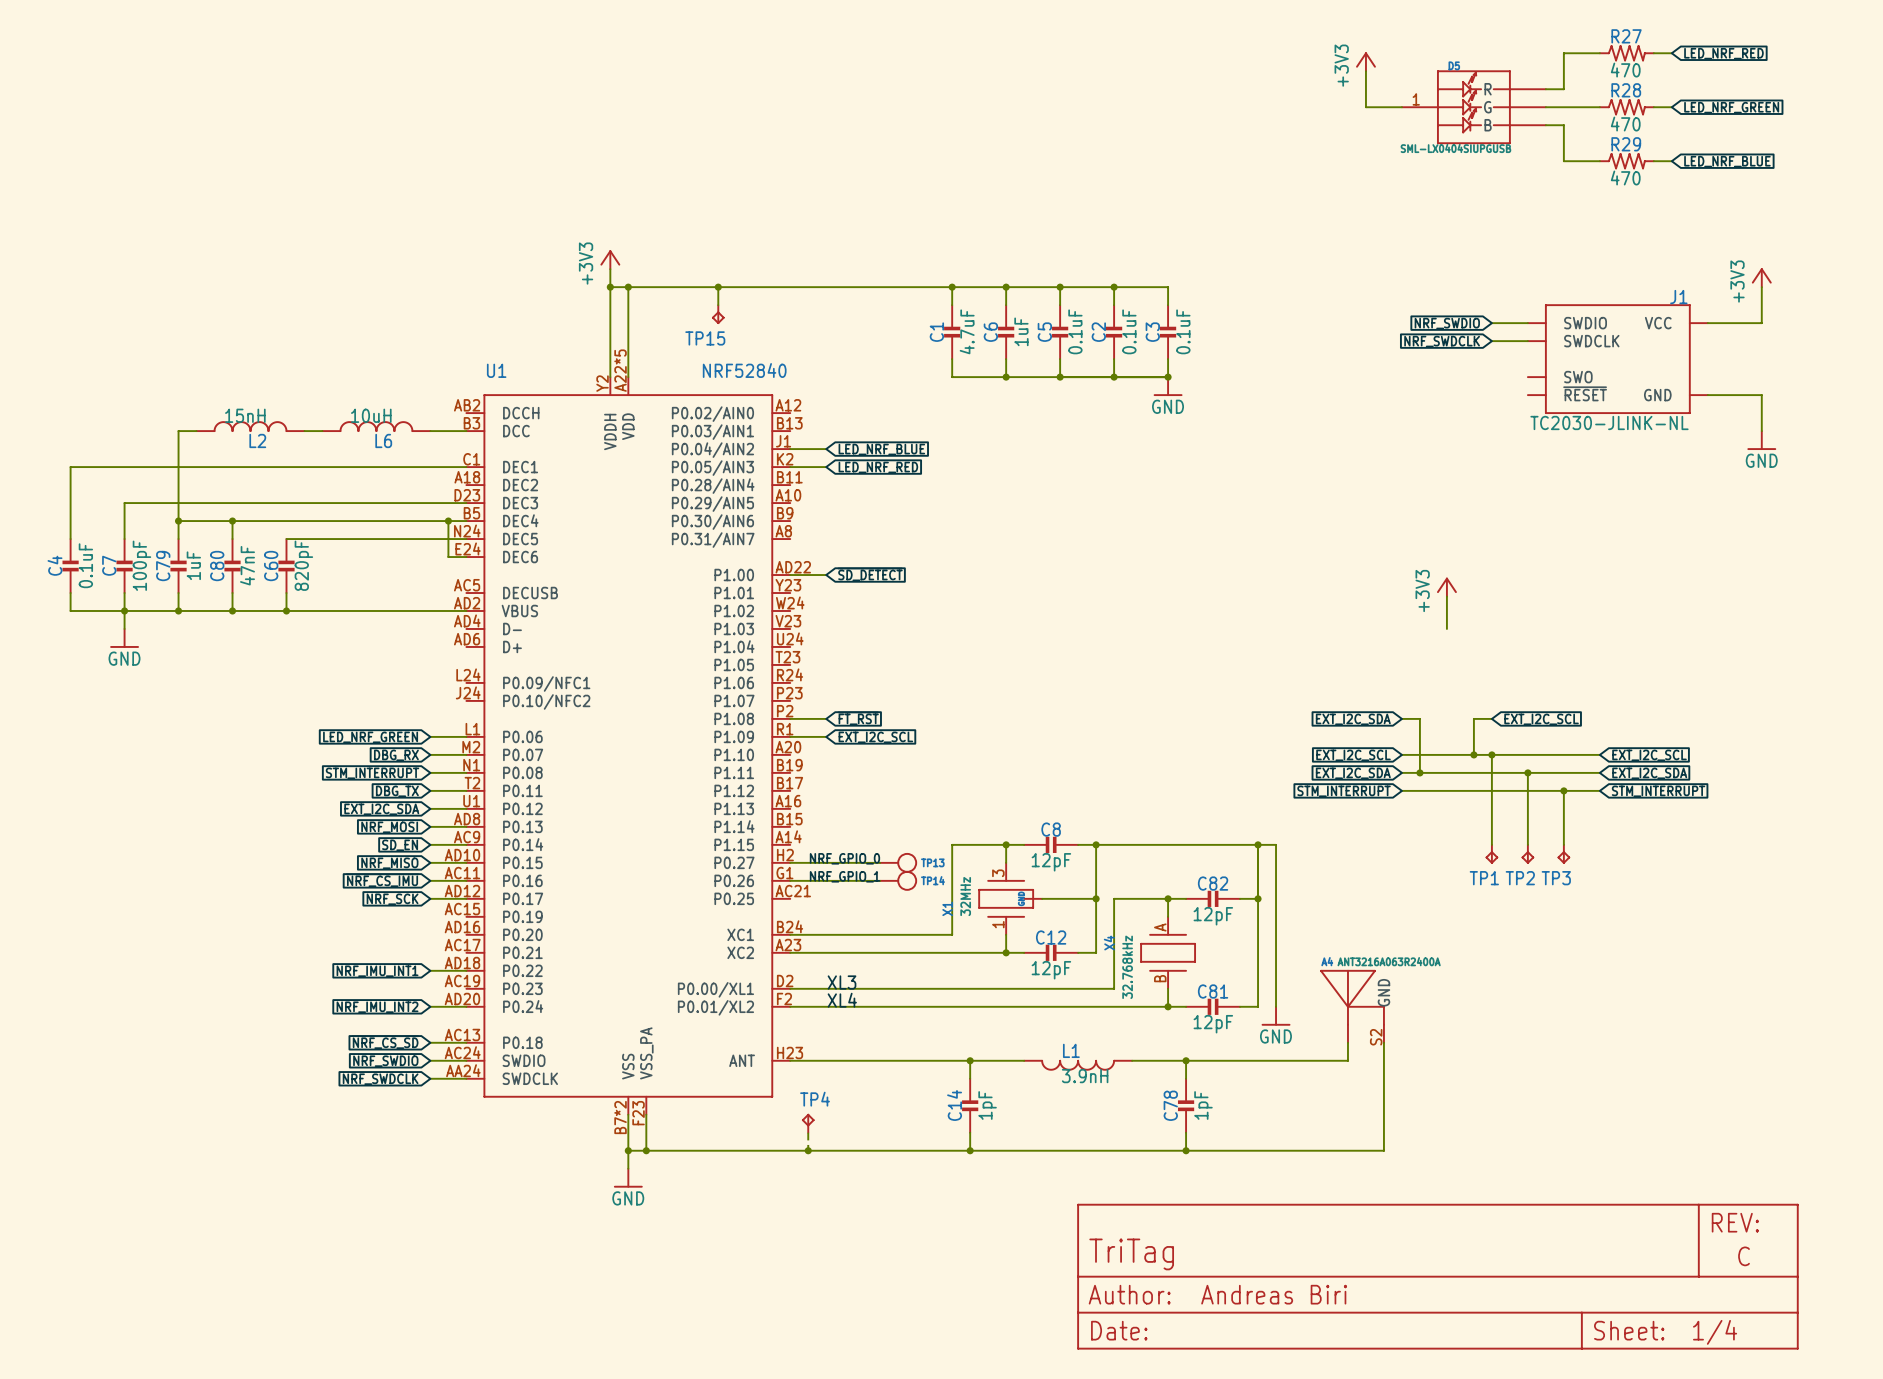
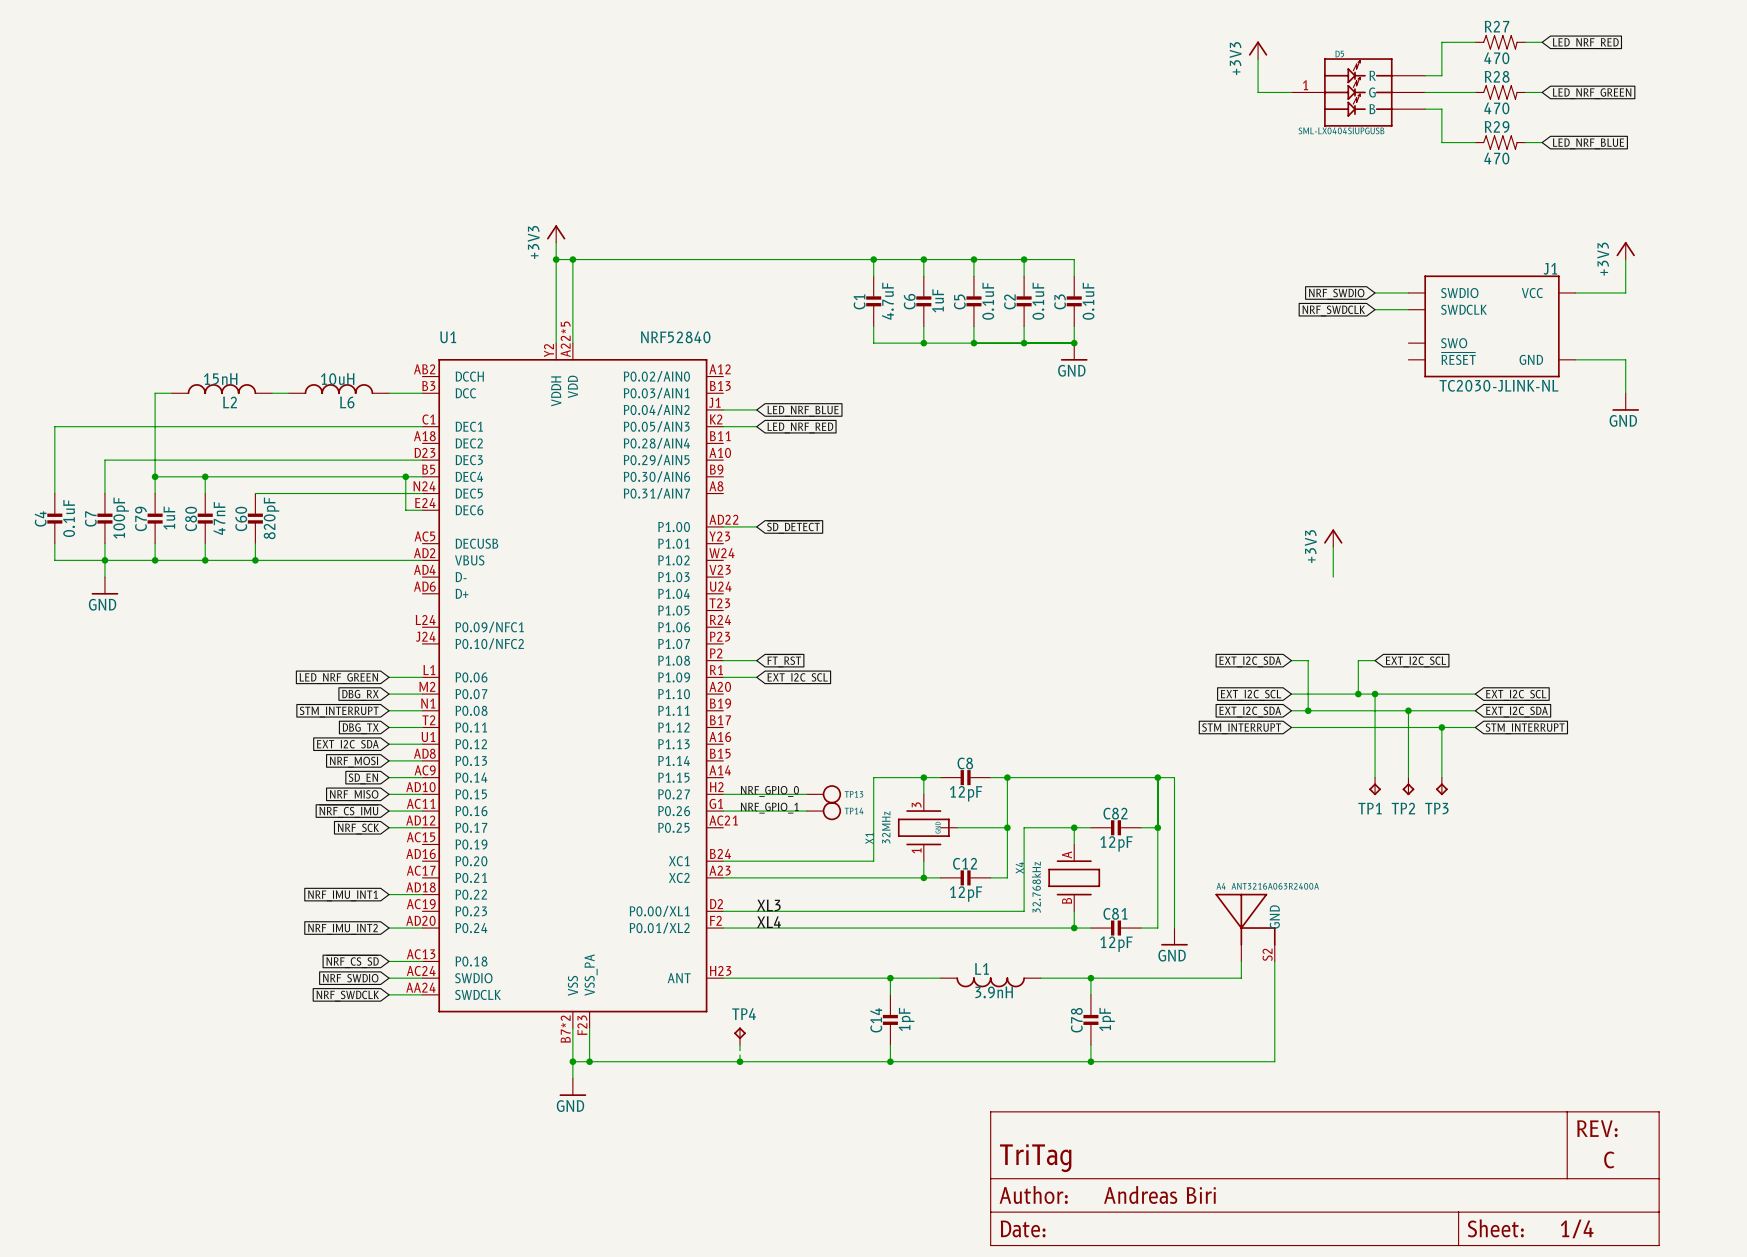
wire: (718, 287) (718, 305) -> none
junction: (718, 287) -> none
TP15: (718, 314) -> none

